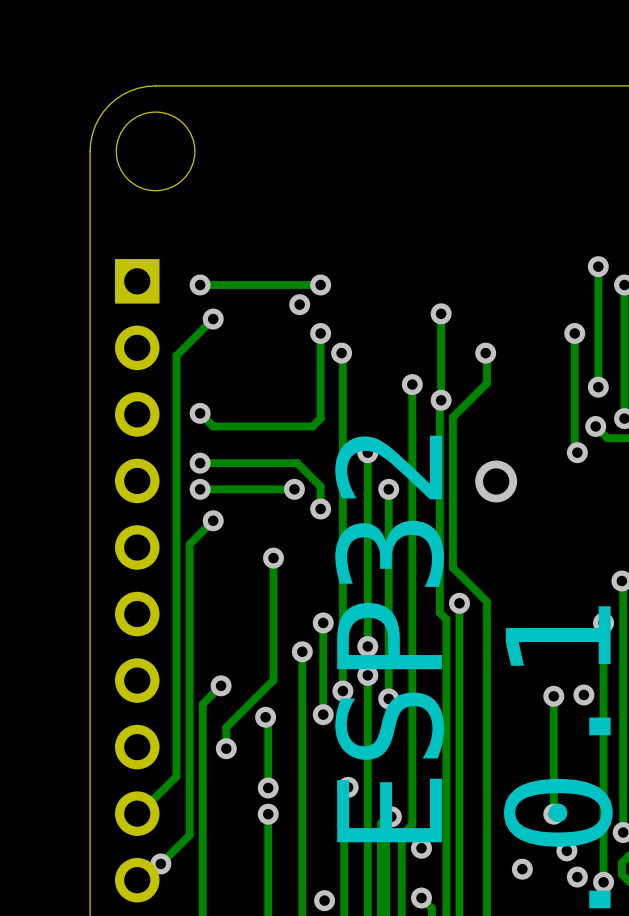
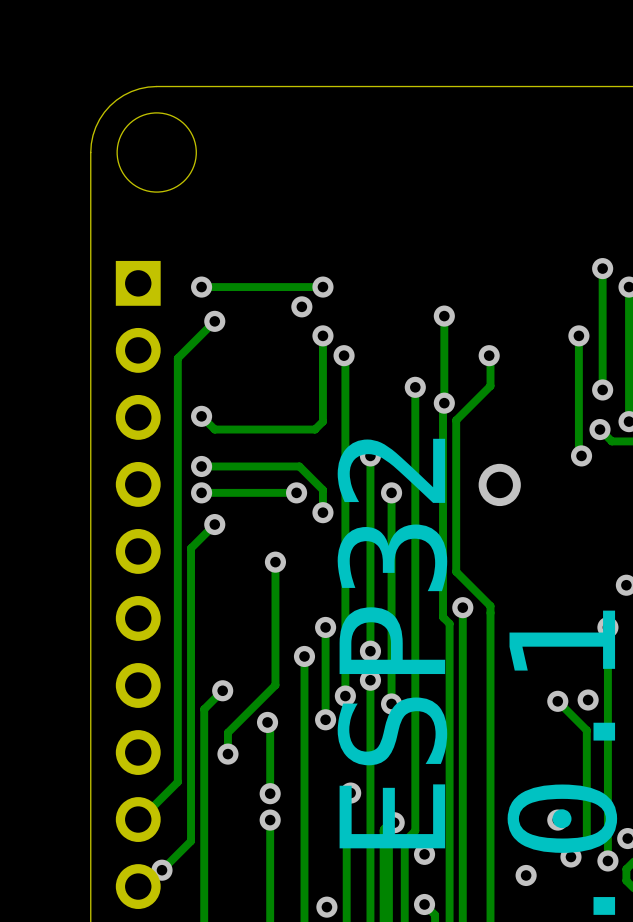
track: (621, 581) (623, 832) -> none
track: (553, 696) (553, 814) -> (557, 701) (586, 730) (586, 841)
track: (603, 854) (603, 882) -> none
via: none -> (607, 860)
via: (577, 877) -> none
via: (603, 882) -> none

